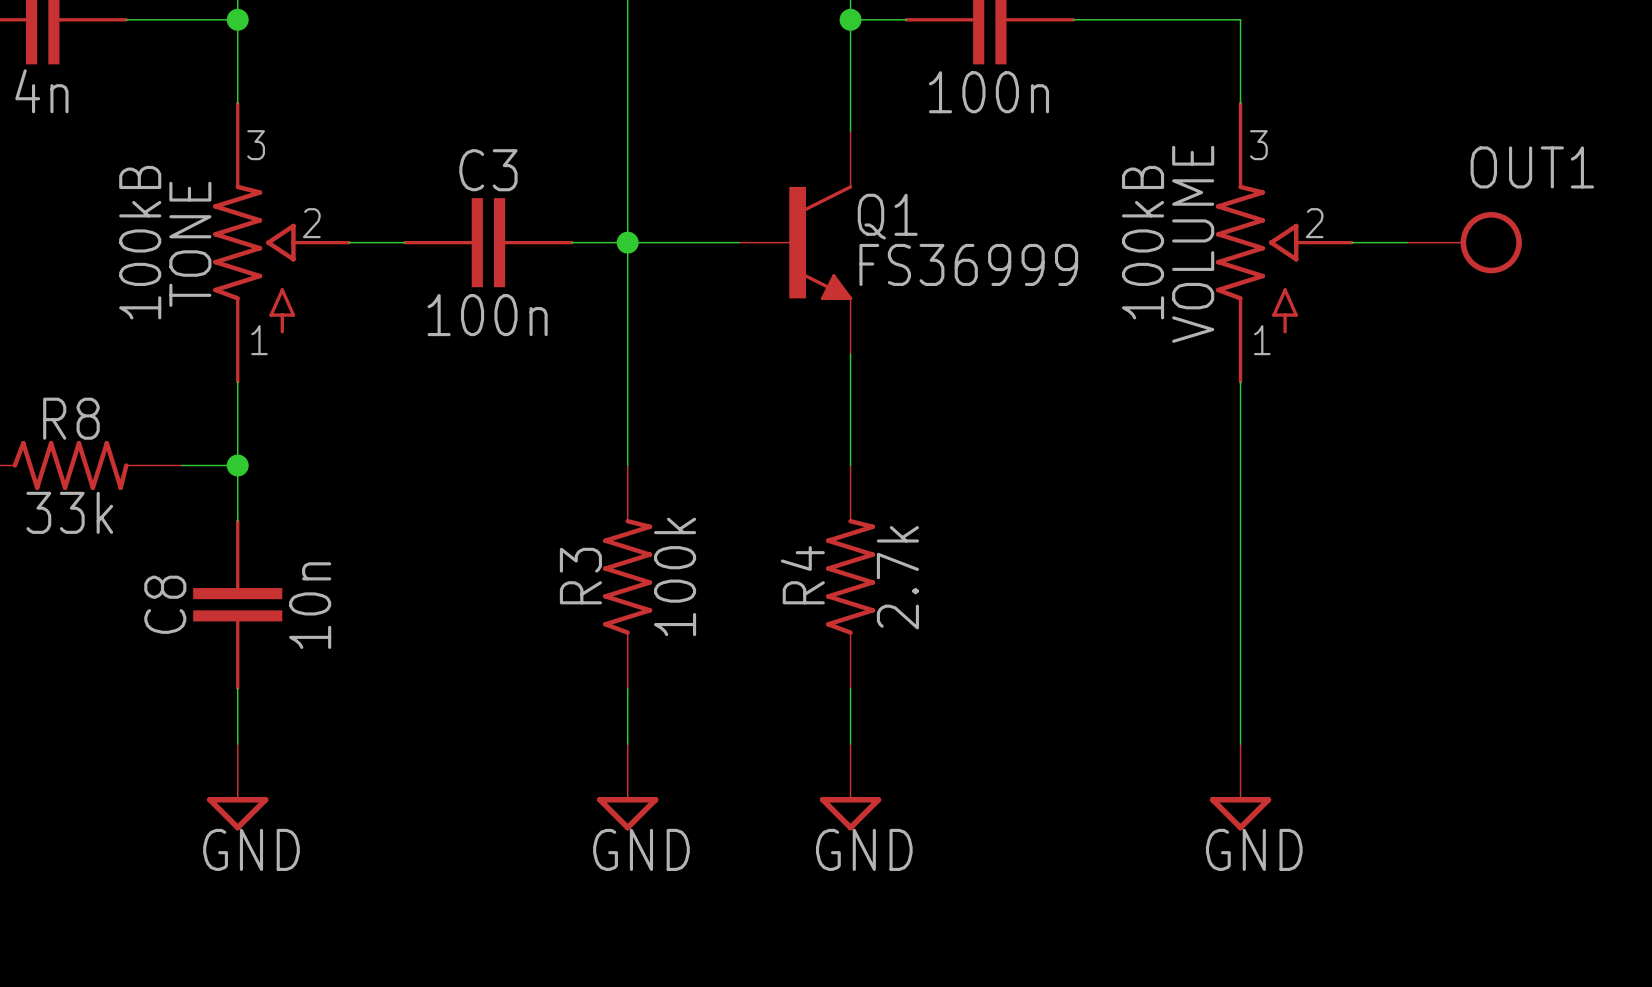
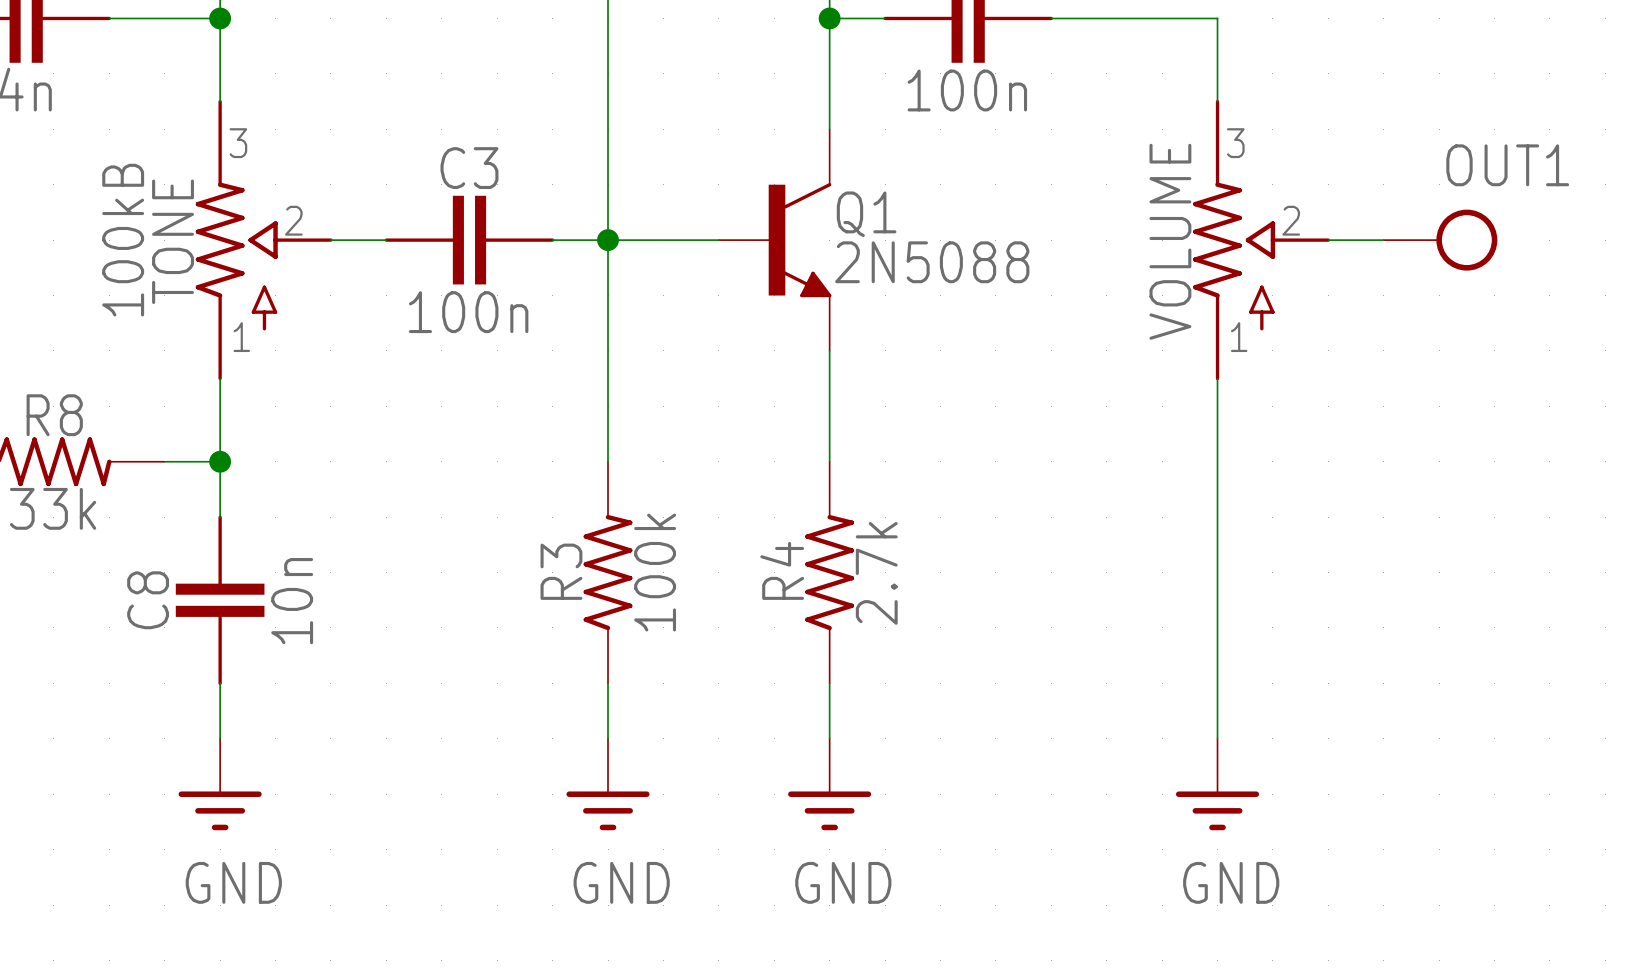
VOLUME value: 100kB (1143, 242) -> none
Q1 value: FS36999 (968, 264) -> 2N5088 (932, 262)
power symbol shape: [207, 744, 269, 831] -> [178, 738, 262, 831]
power symbol shape: [597, 744, 659, 831] -> [566, 738, 650, 831]
power symbol shape: [819, 744, 882, 831] -> [788, 738, 872, 831]
power symbol shape: [1209, 744, 1272, 831] -> [1175, 738, 1260, 831]
power symbol text position: GND (251, 849) -> GND (233, 882)
power symbol text position: GND (641, 849) -> GND (621, 882)
power symbol text position: GND (864, 849) -> GND (843, 882)
power symbol text position: GND (1254, 849) -> GND (1231, 882)

